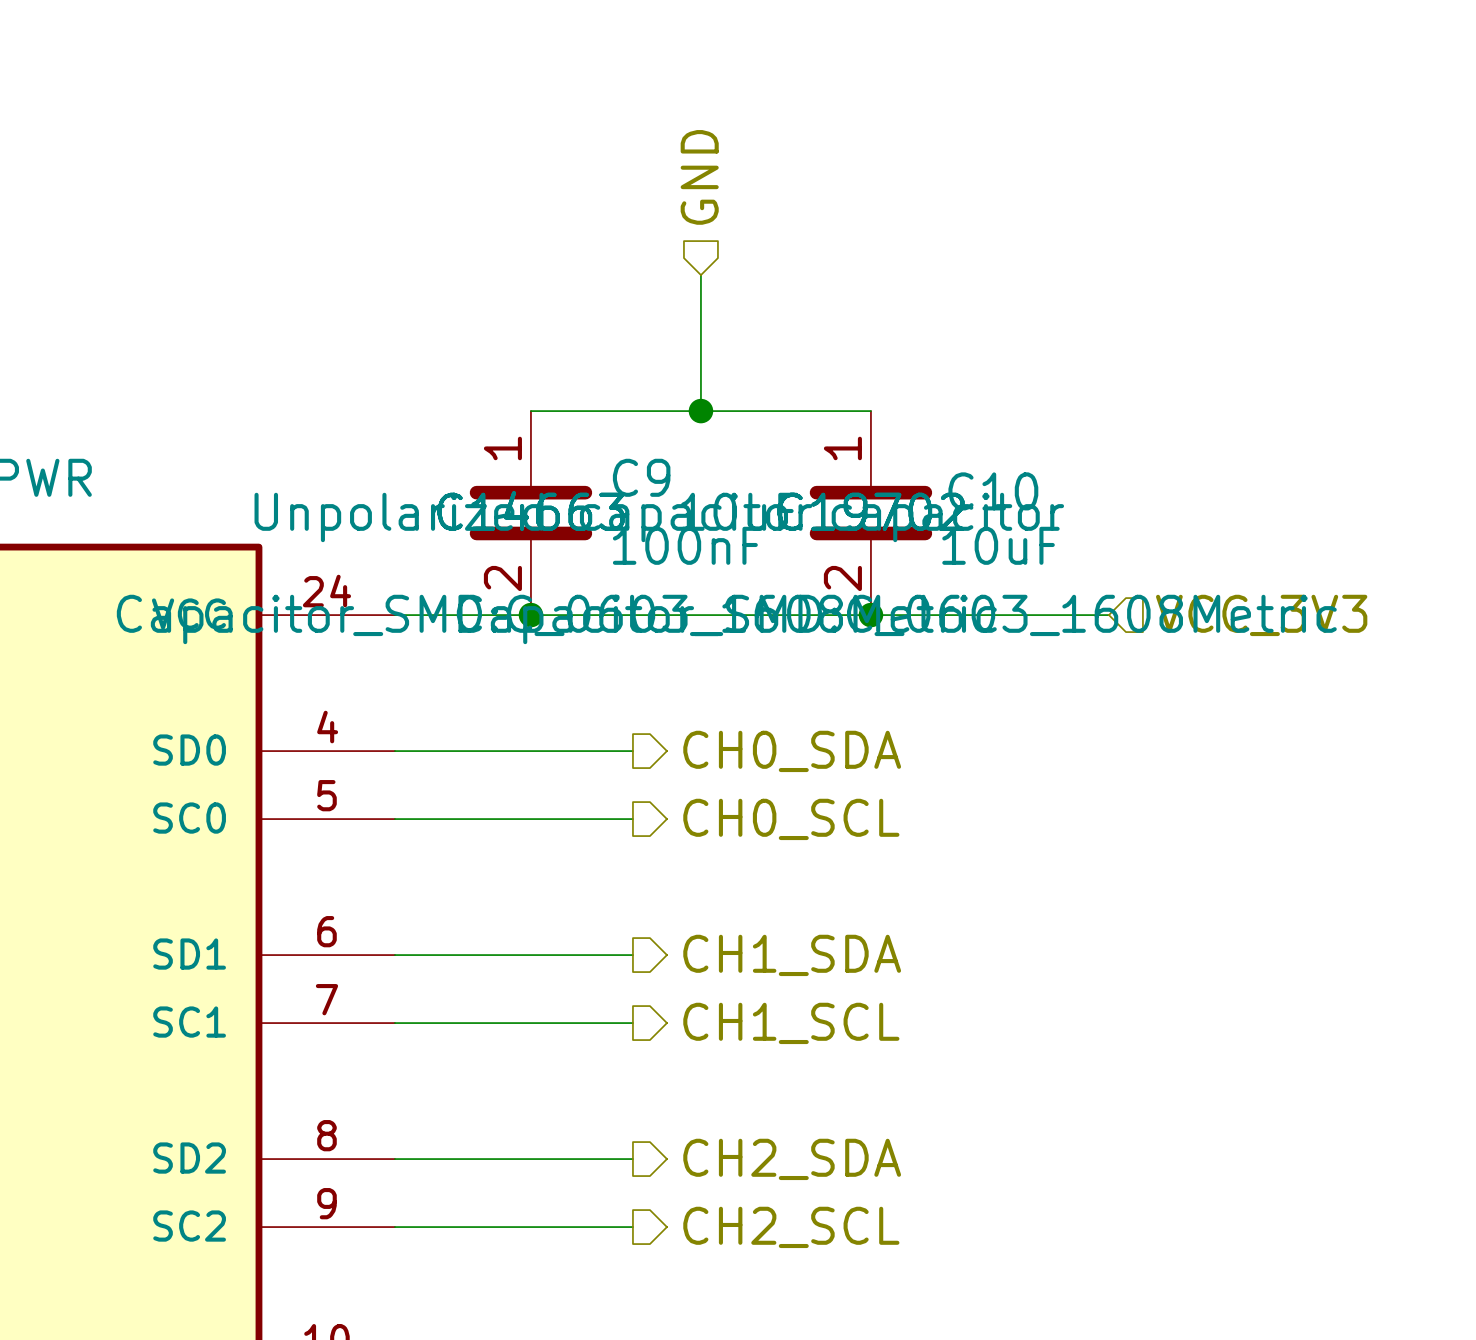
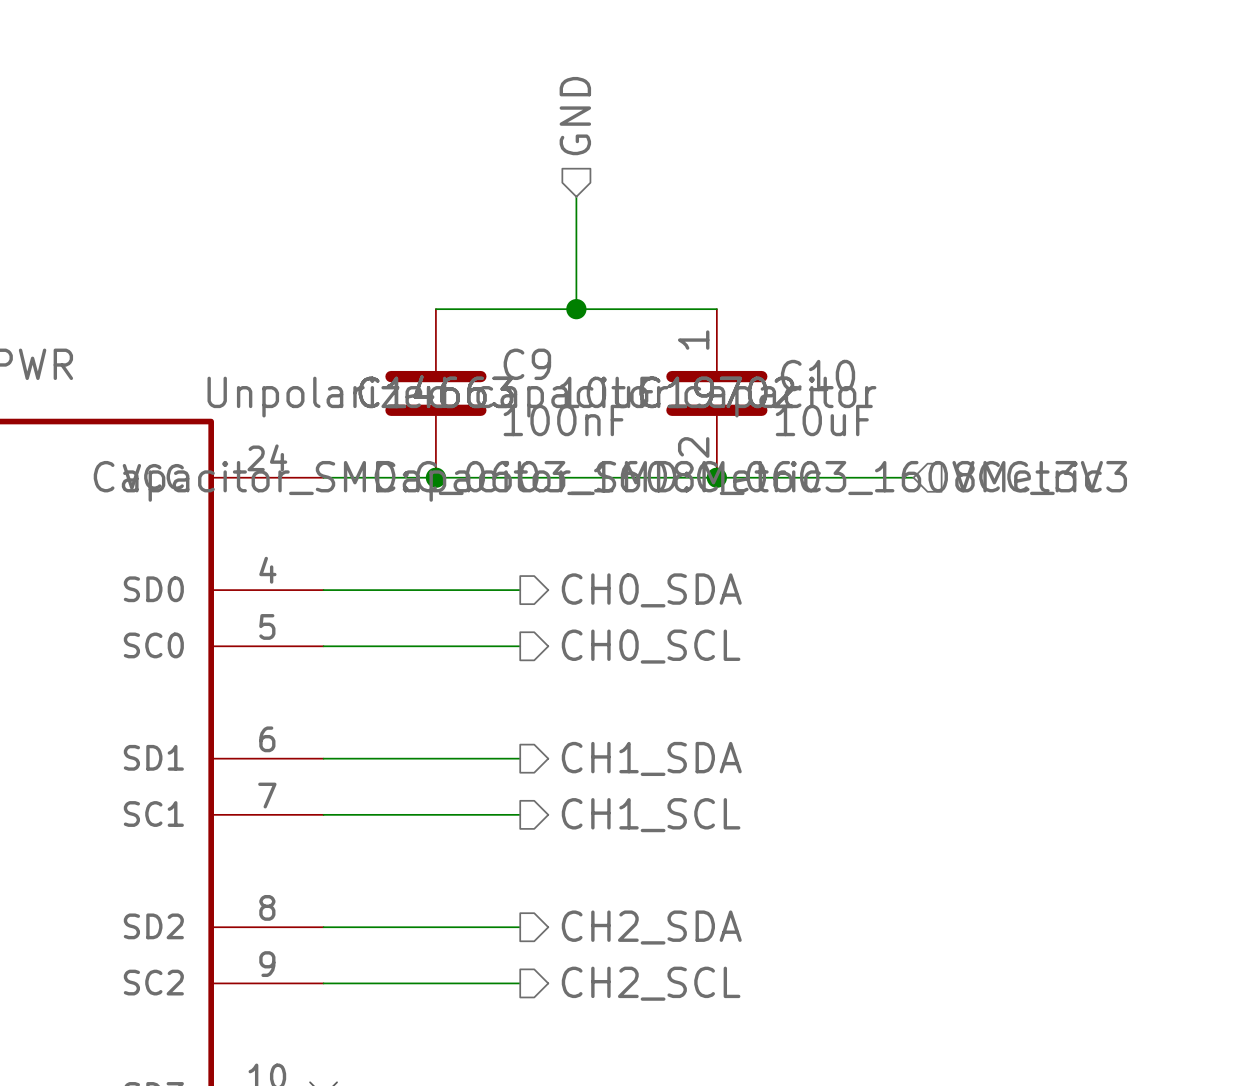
C9 pin number: 1 (502, 448) -> none
C9 pin number: 2 (502, 578) -> none

